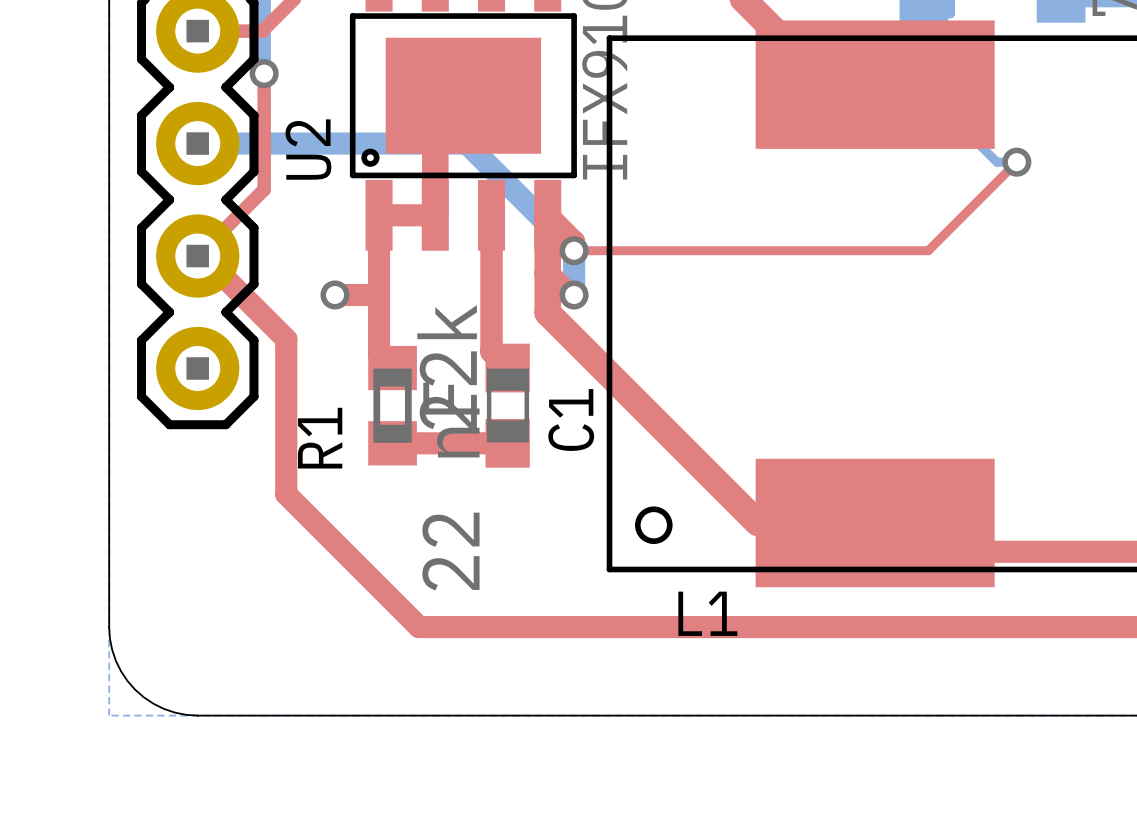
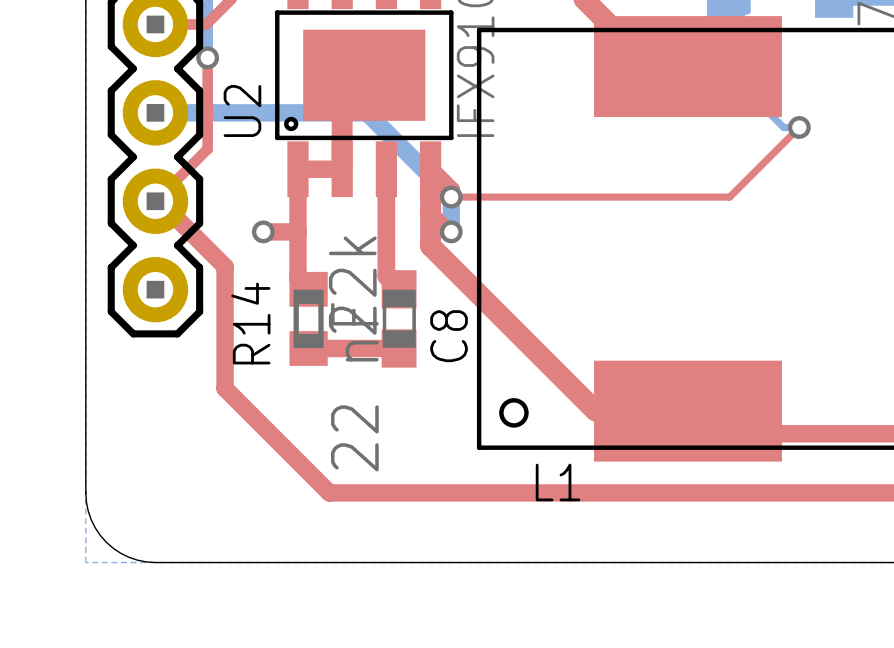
C1 name: C1 (571, 420) -> C8 (449, 336)
R1 name: R1 (320, 438) -> R14 (250, 323)

